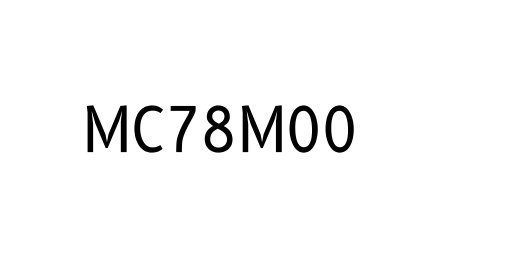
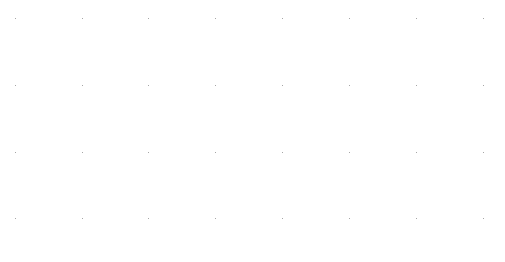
text: MC78M00 (220, 128) -> none

